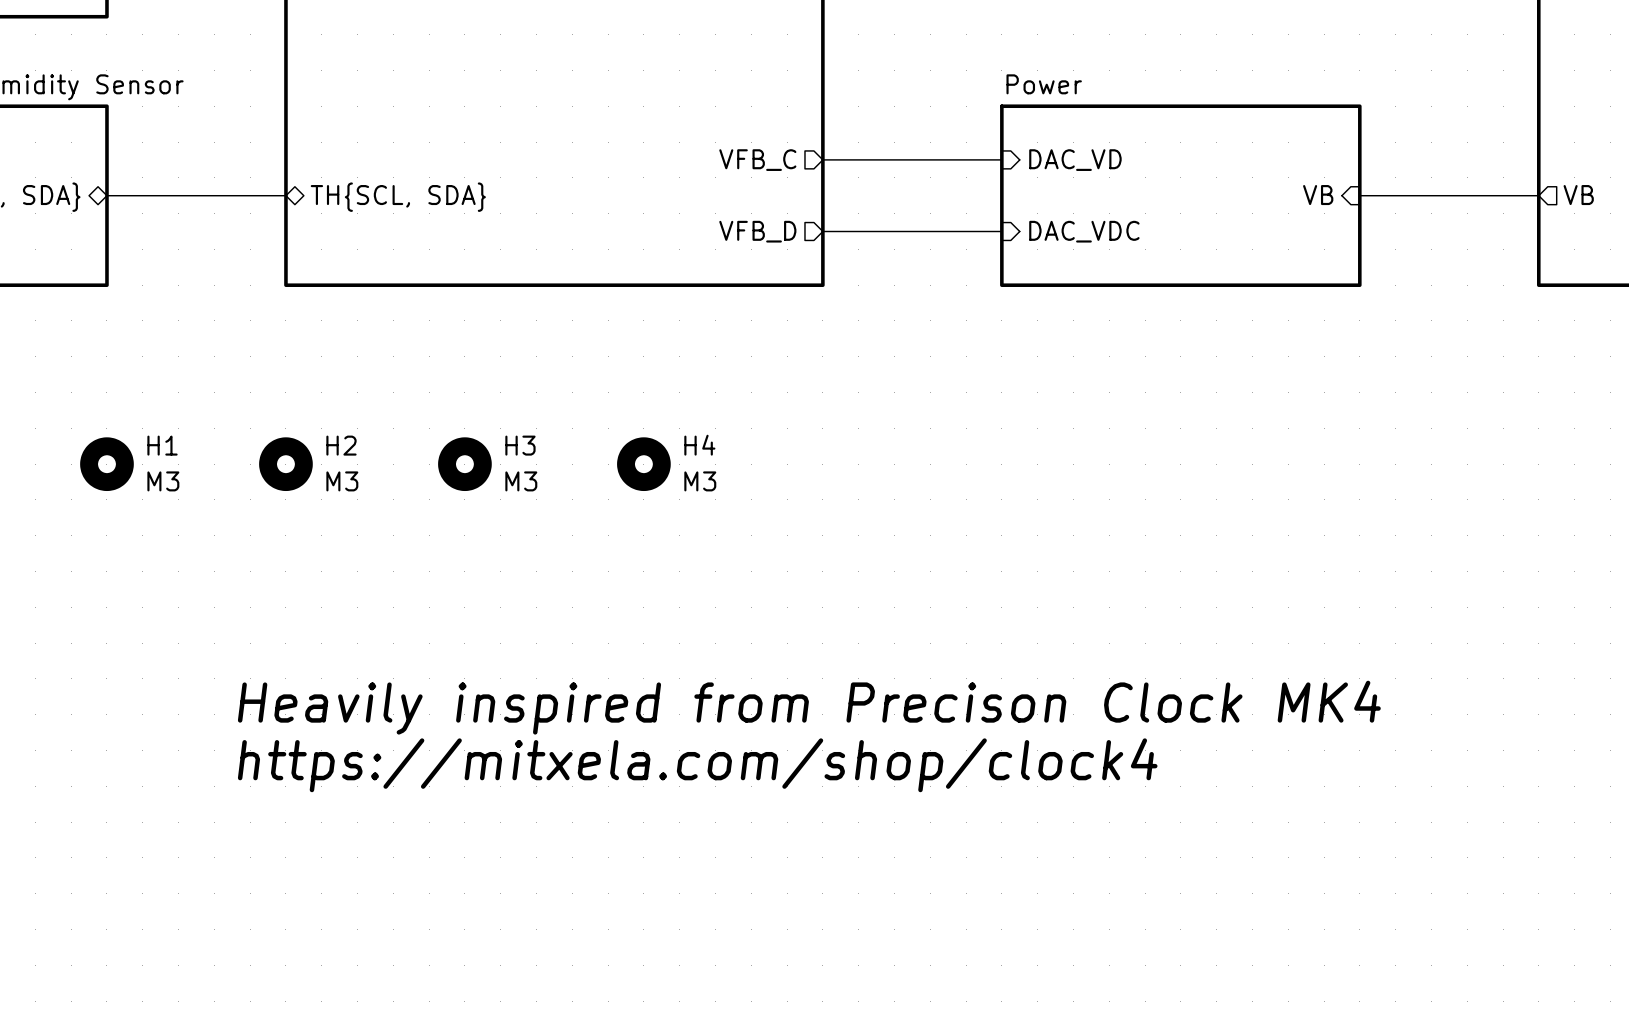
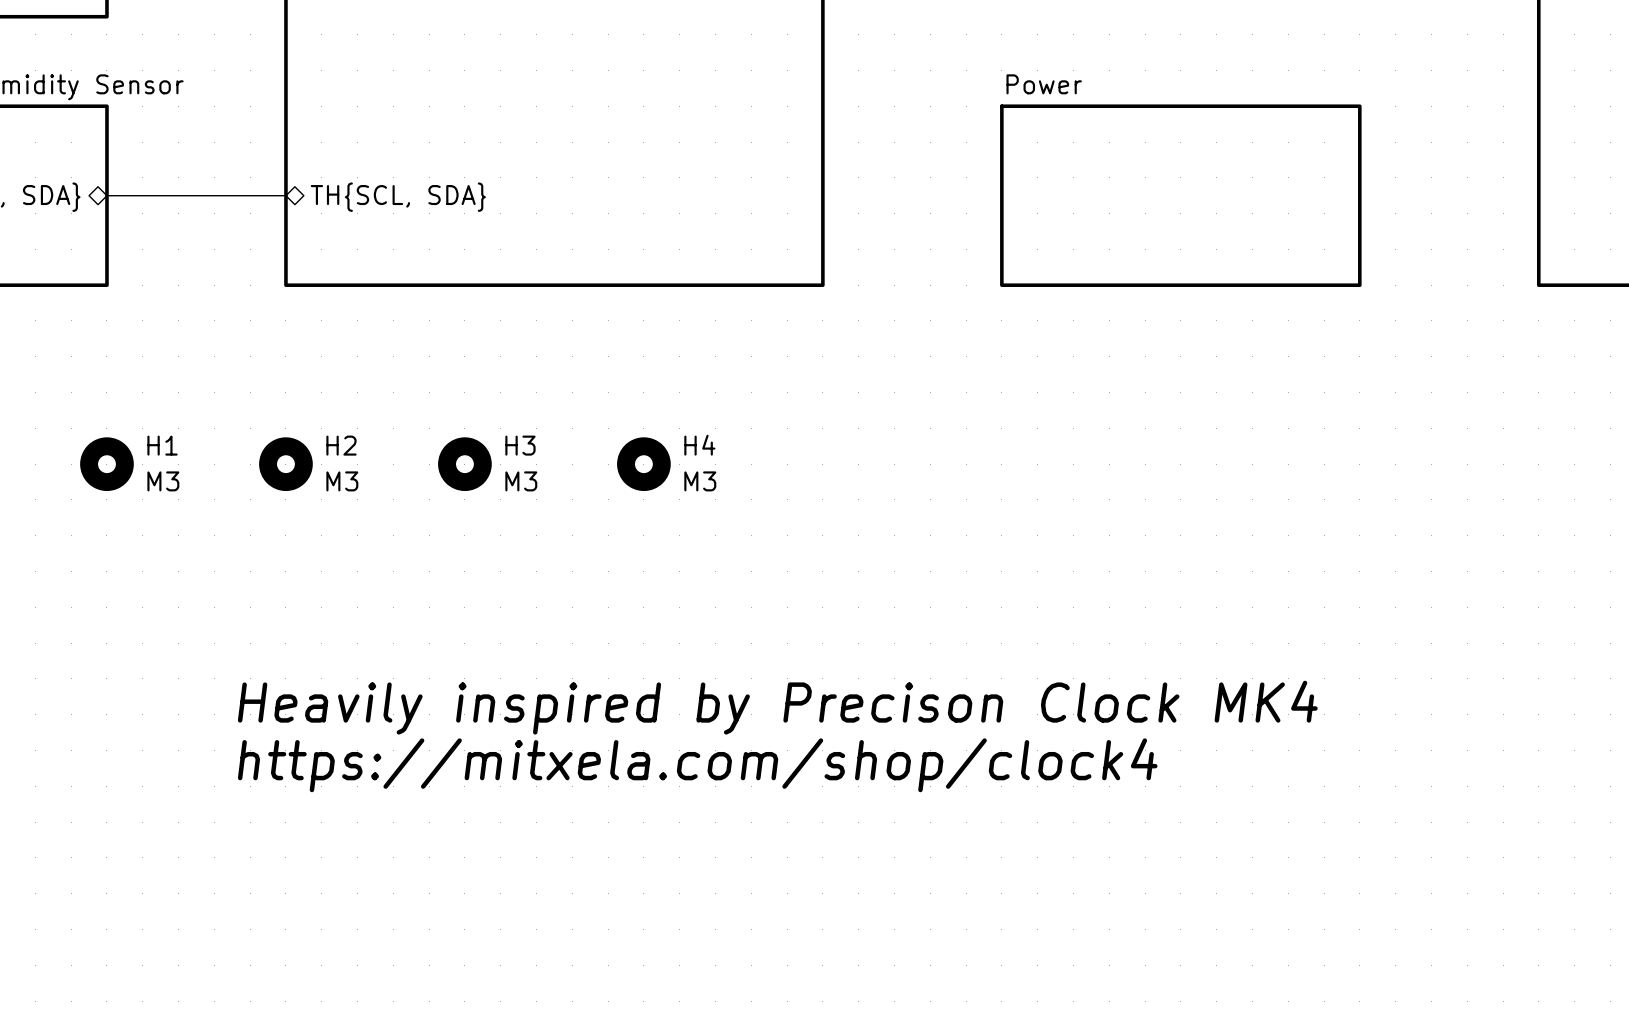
wire: (822, 159) (1001, 159) -> none
sheet pin: VFB_C (757, 160) -> none
sheet pin: DAC_VD (1075, 160) -> none
sheet pin: VB (1318, 195) -> none
wire: (1359, 195) (1538, 195) -> none
sheet pin: VB (1578, 195) -> none
sheet pin: VFB_D (757, 231) -> none
wire: (822, 231) (1001, 231) -> none
sheet pin: DAC_VDC (1084, 231) -> none
text: Heavily inspired from Precison Clock MK4 (809, 707) -> Heavily inspired by Precison Clock MK4 (777, 707)

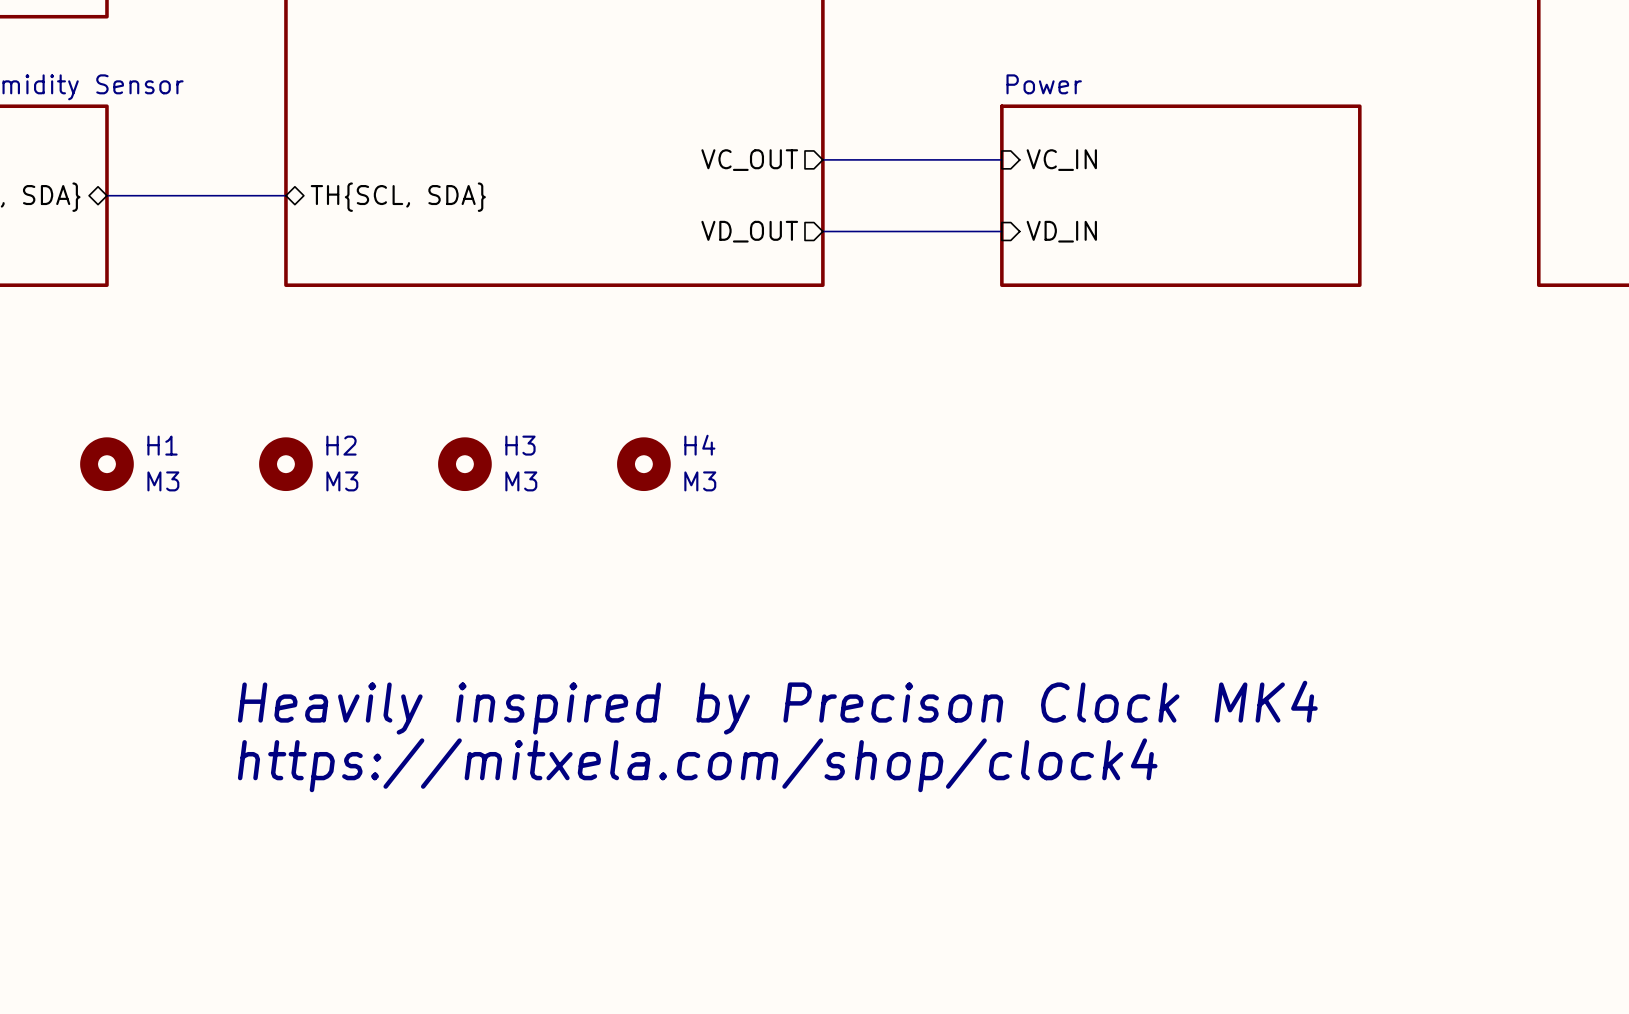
wire: none -> (822, 159) (1001, 159)
sheet pin: none -> VC_OUT (749, 160)
sheet pin: none -> VC_IN (1061, 160)
sheet pin: none -> VD_OUT (749, 231)
wire: none -> (822, 231) (1001, 231)
sheet pin: none -> VD_IN (1061, 231)

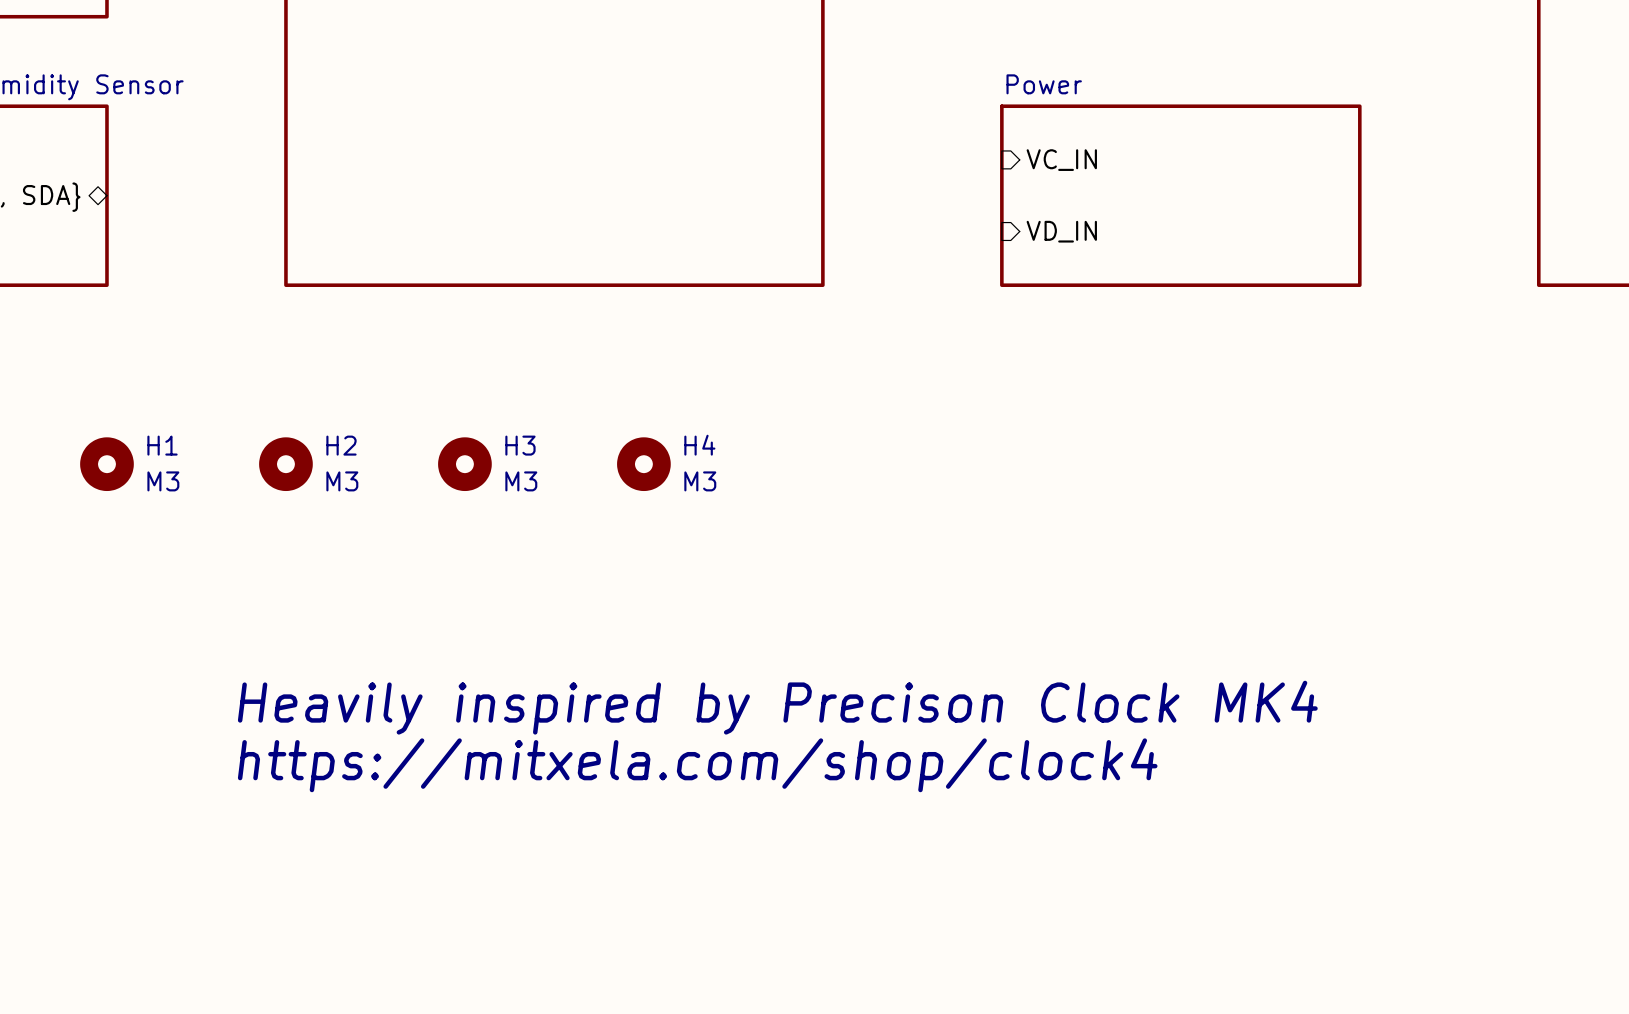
wire: (822, 159) (1001, 159) -> none
sheet pin: VC_OUT (749, 160) -> none
bus: (106, 195) (285, 195) -> none
sheet pin: TH{SCL, SDA} (398, 197) -> none
sheet pin: VD_OUT (749, 231) -> none
wire: (822, 231) (1001, 231) -> none

